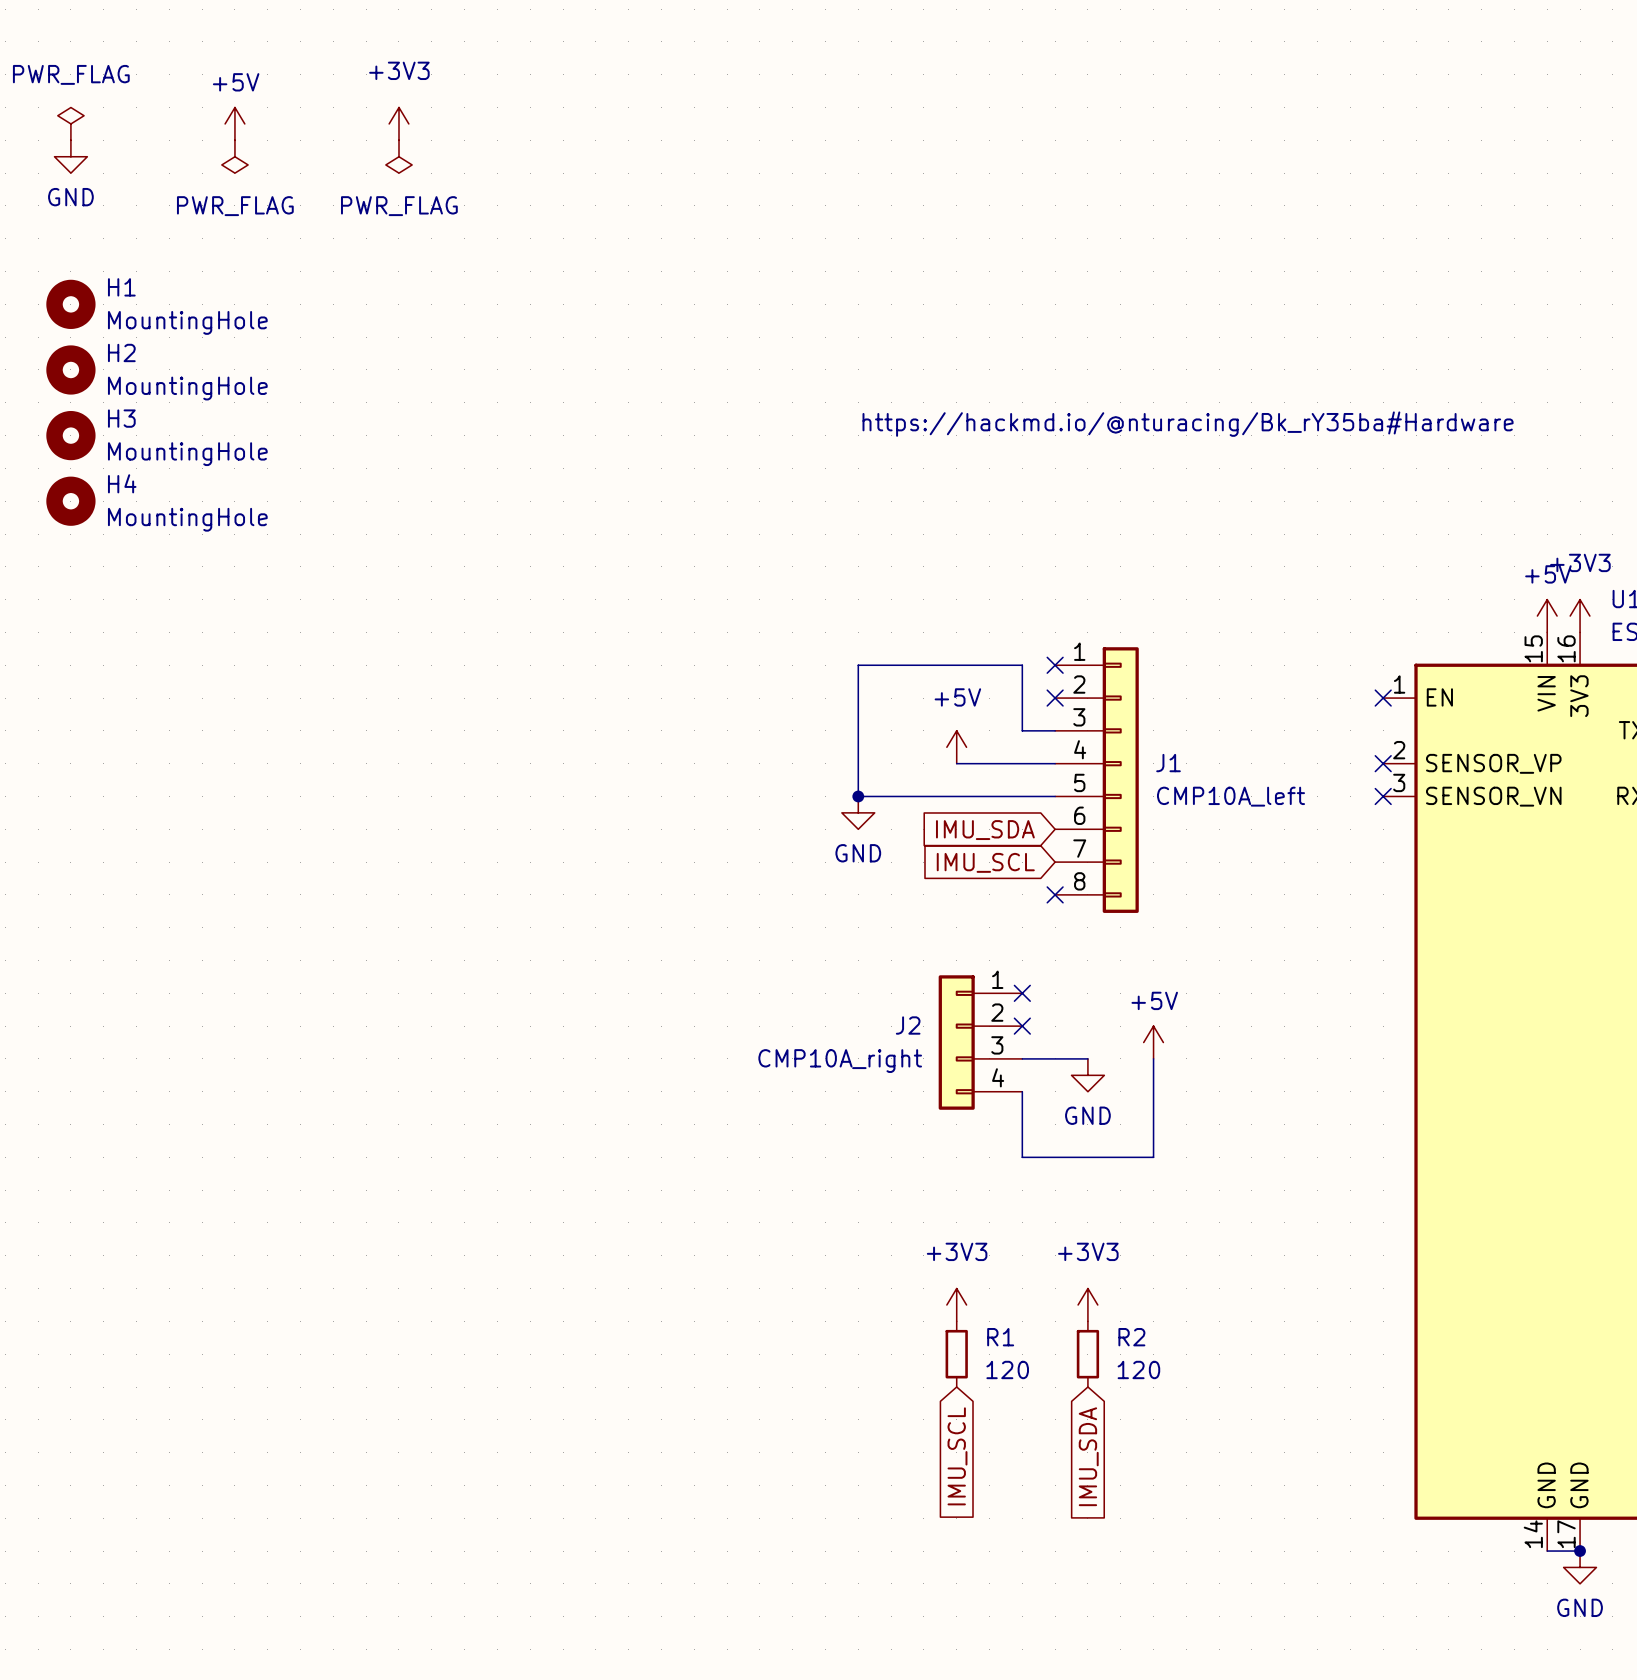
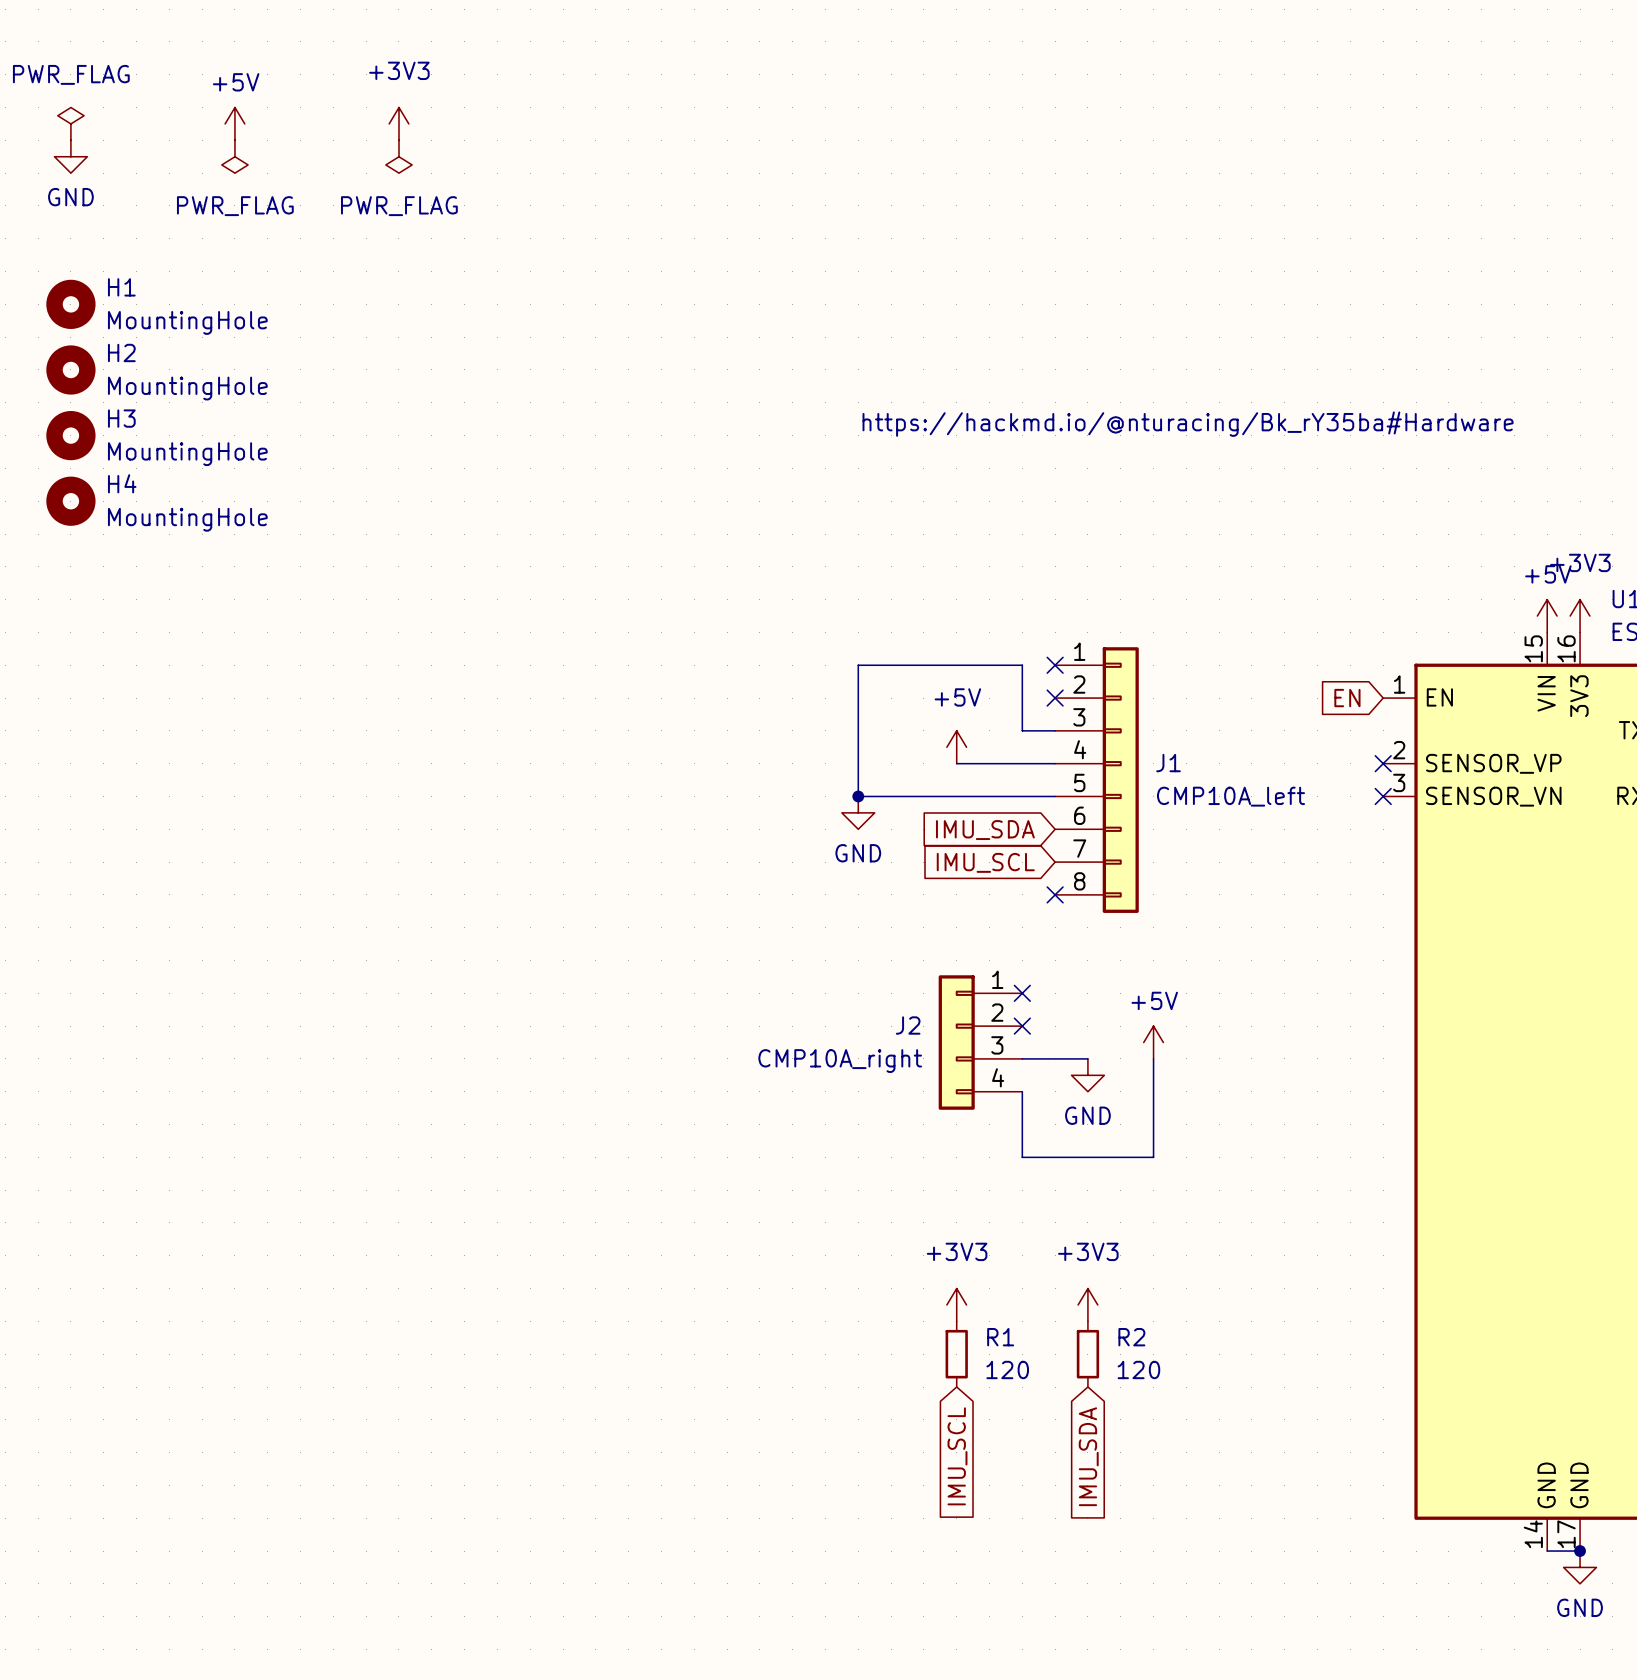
global label: none -> EN (1347, 698)
no-connect mark: (1383, 698) -> none

